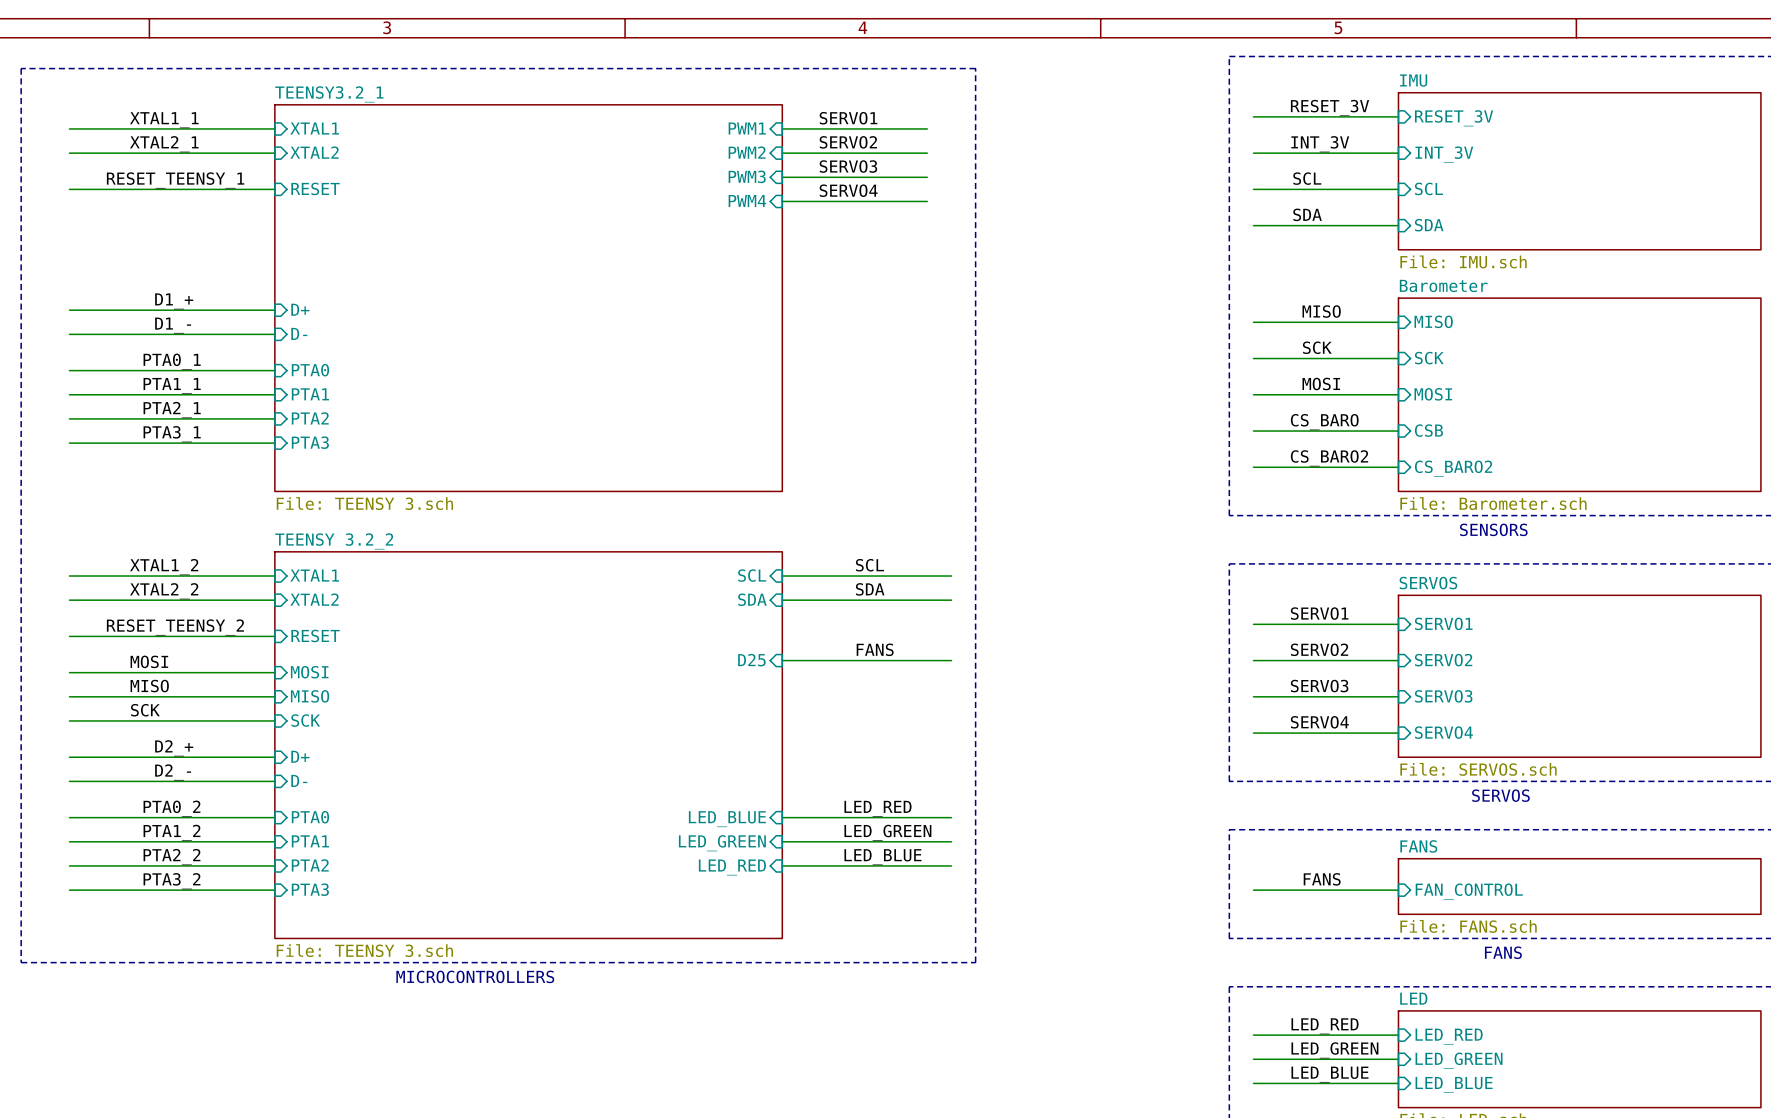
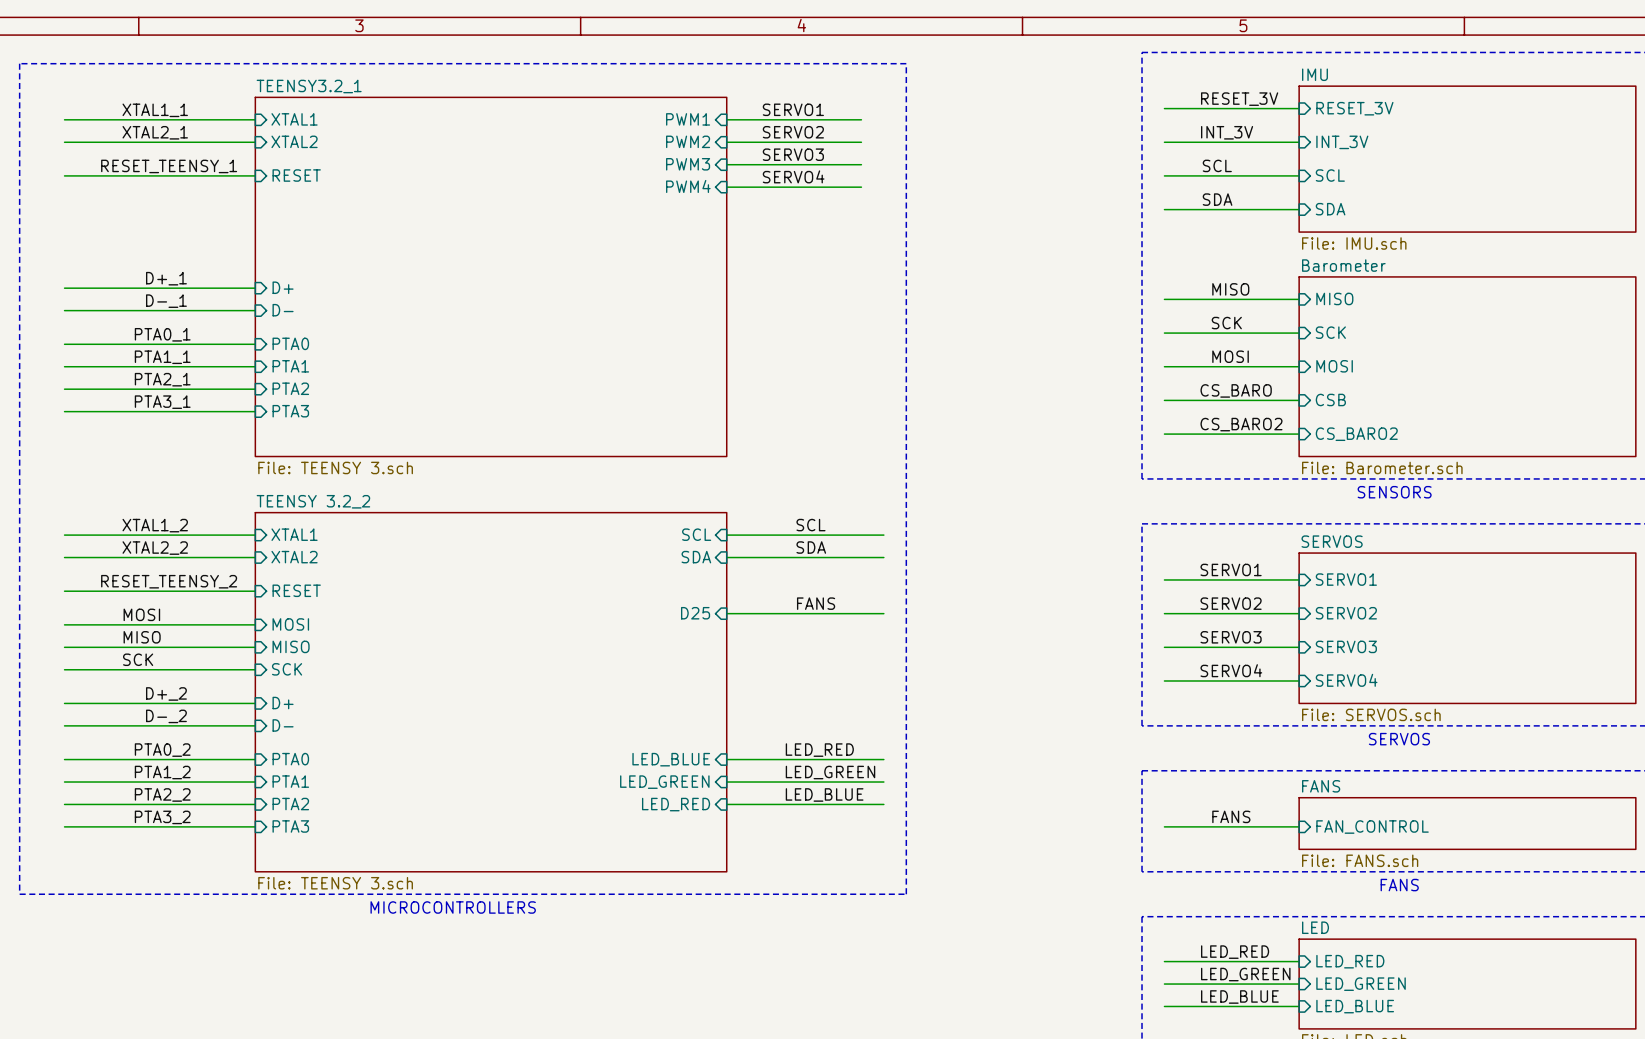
label: D1_+ (174, 301) -> D+_1 (166, 278)
label: D1_- (173, 325) -> D-_1 (166, 301)
label: D2_+ (174, 748) -> D+_2 (166, 693)
label: D2_- (173, 772) -> D-_2 (166, 716)

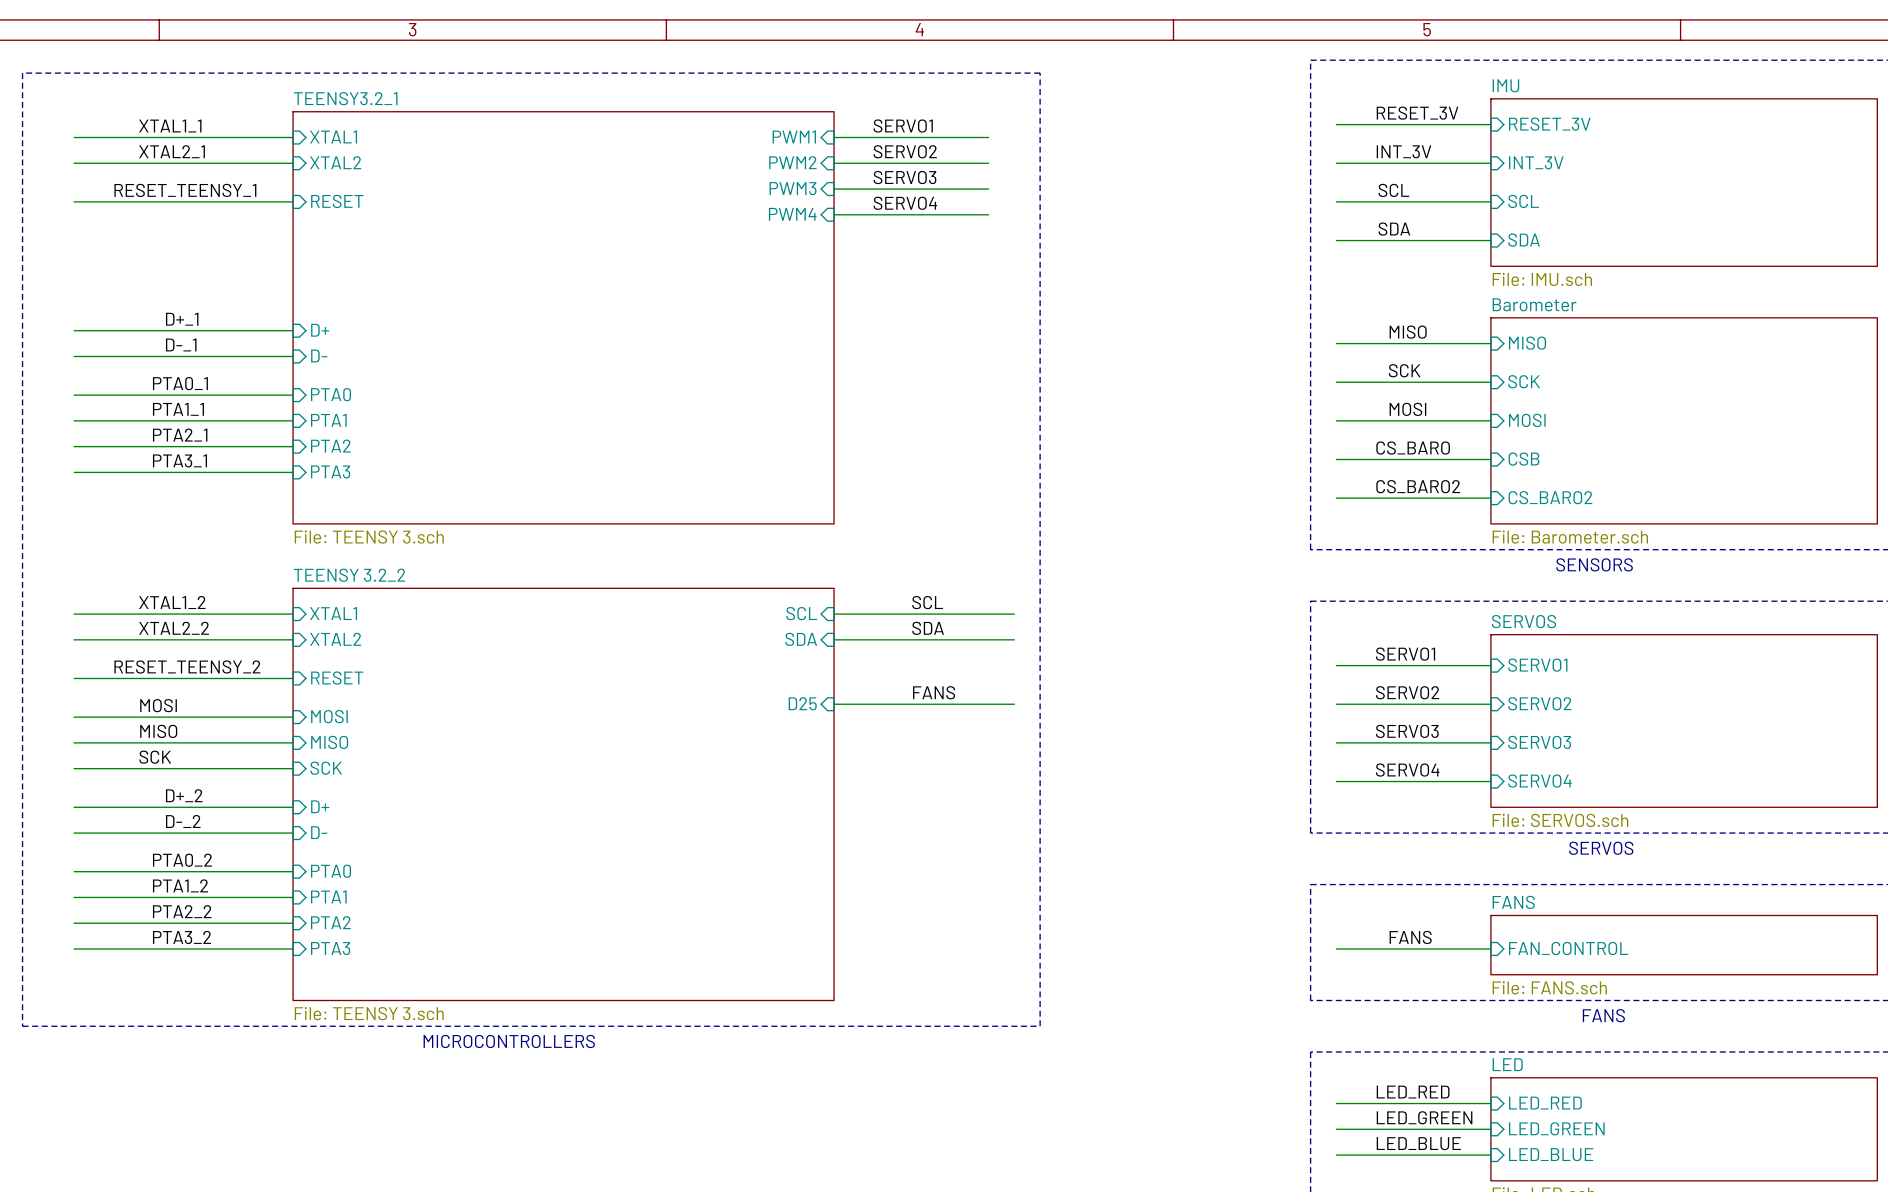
label: LED_RED (819, 750) -> none
sheet pin: LED_BLUE (671, 759) -> none
wire: (726, 759) (883, 759) -> none
label: LED_GREEN (830, 772) -> none
sheet pin: LED_GREEN (664, 782) -> none
wire: (726, 782) (883, 782) -> none
label: LED_BLUE (824, 794) -> none
sheet pin: LED_RED (676, 804) -> none
wire: (726, 804) (883, 804) -> none

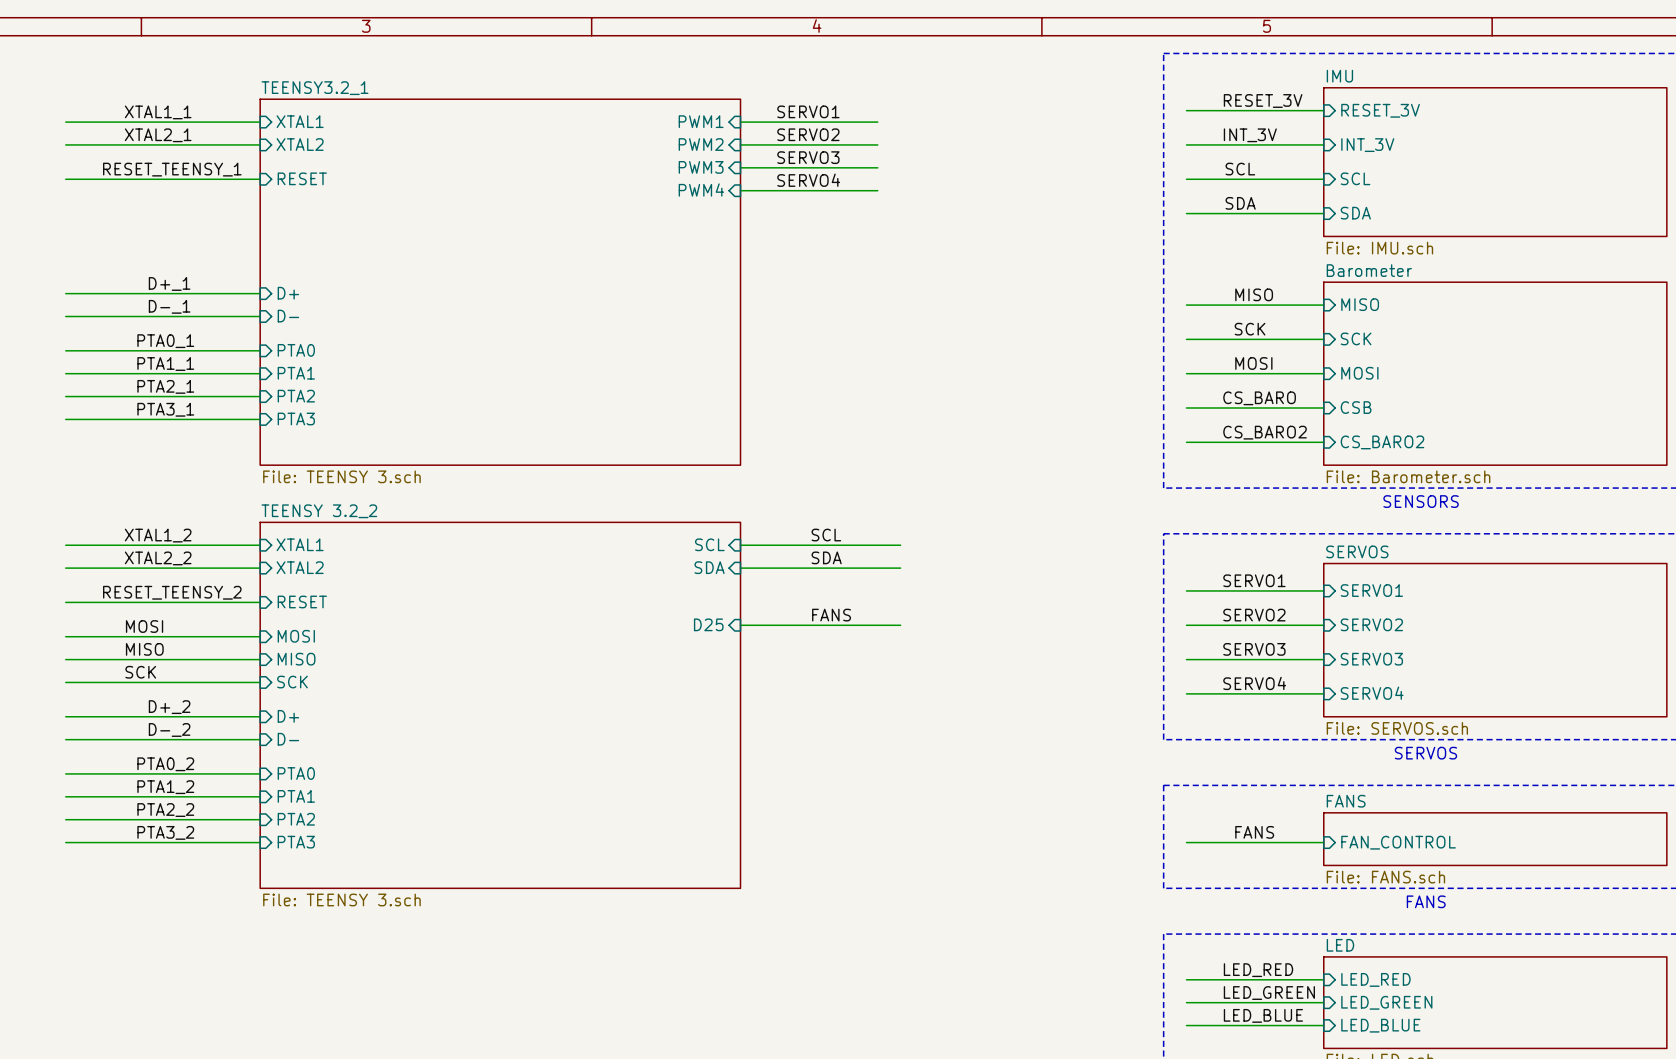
line: (22, 73) (22, 1026) (1040, 1026) (1040, 73) (22, 73) -> none
text: MICROCONTROLLERS (509, 1041) -> none

